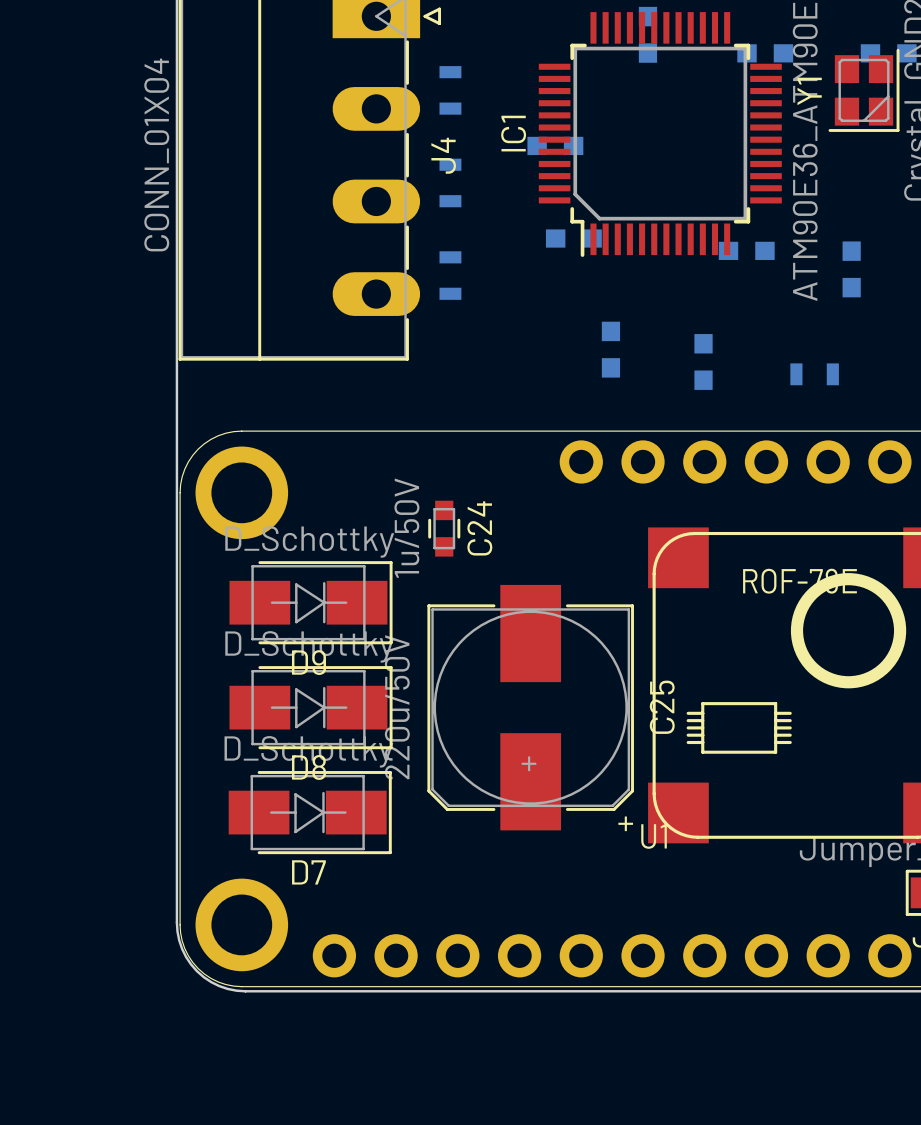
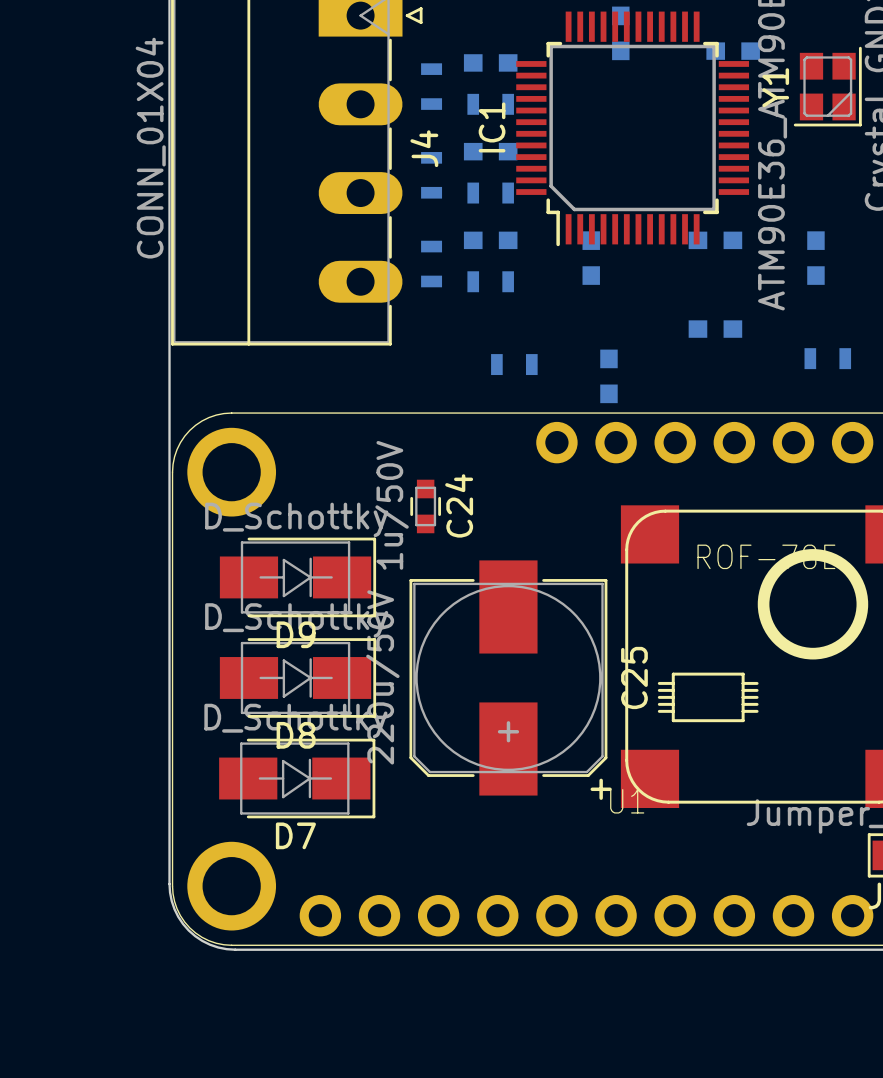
part: (888, 53) -> none
part: none -> (490, 62)
part: none -> (490, 104)
part position: (555, 145) -> (490, 151)
part: none -> (490, 193)
part: (573, 238) -> none
part: none -> (490, 240)
part: none -> (591, 258)
part: none -> (490, 281)
part: none -> (715, 329)
part: (610, 349) -> none
part: (703, 361) -> none
part position: (814, 374) -> (827, 358)
part: none -> (514, 364)
part: none -> (608, 376)

